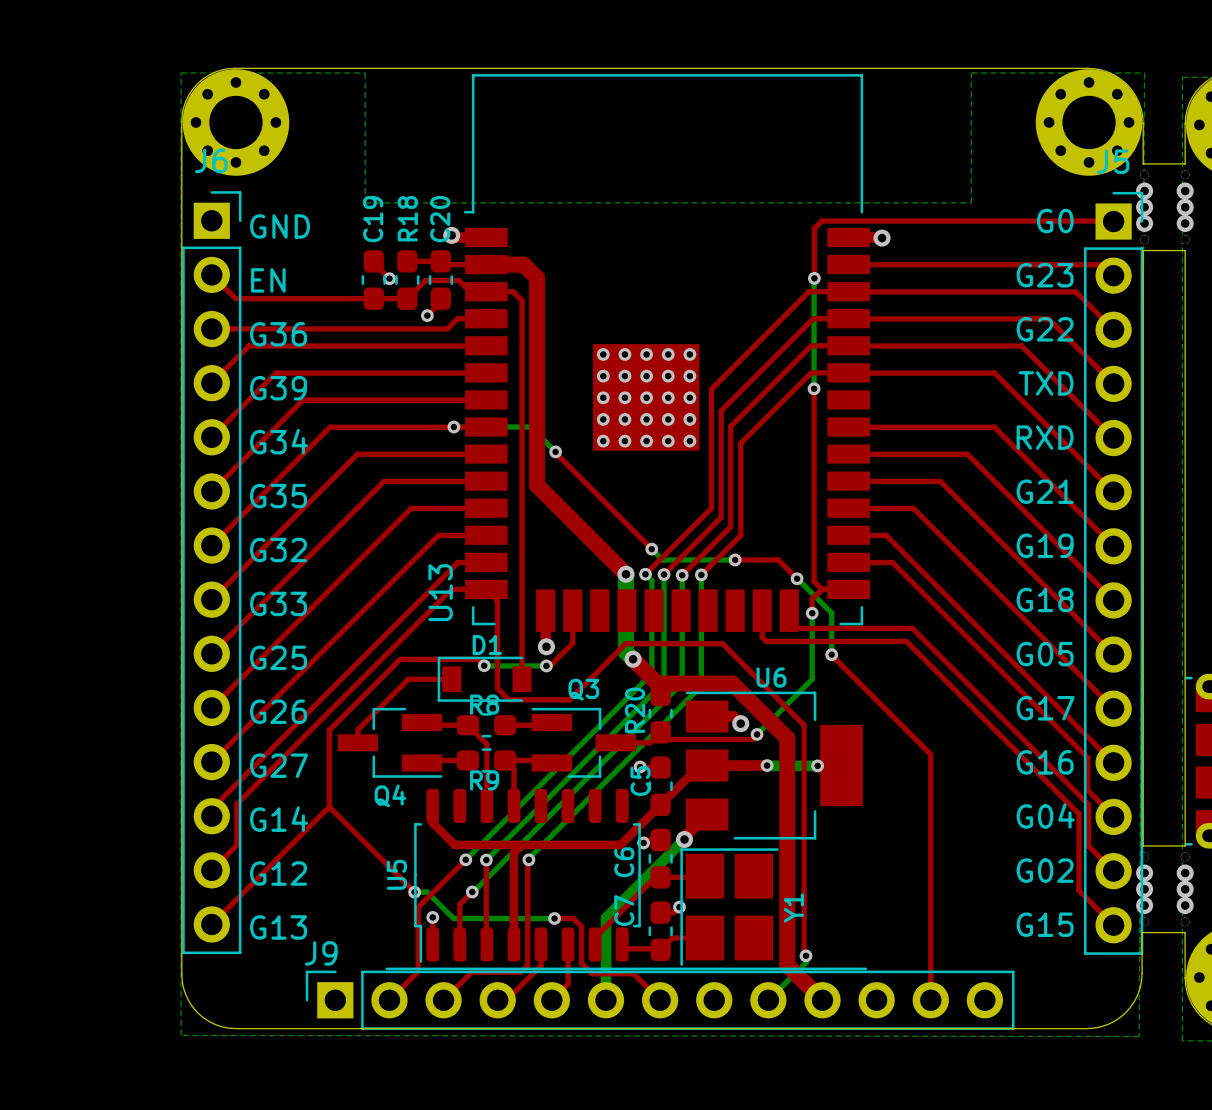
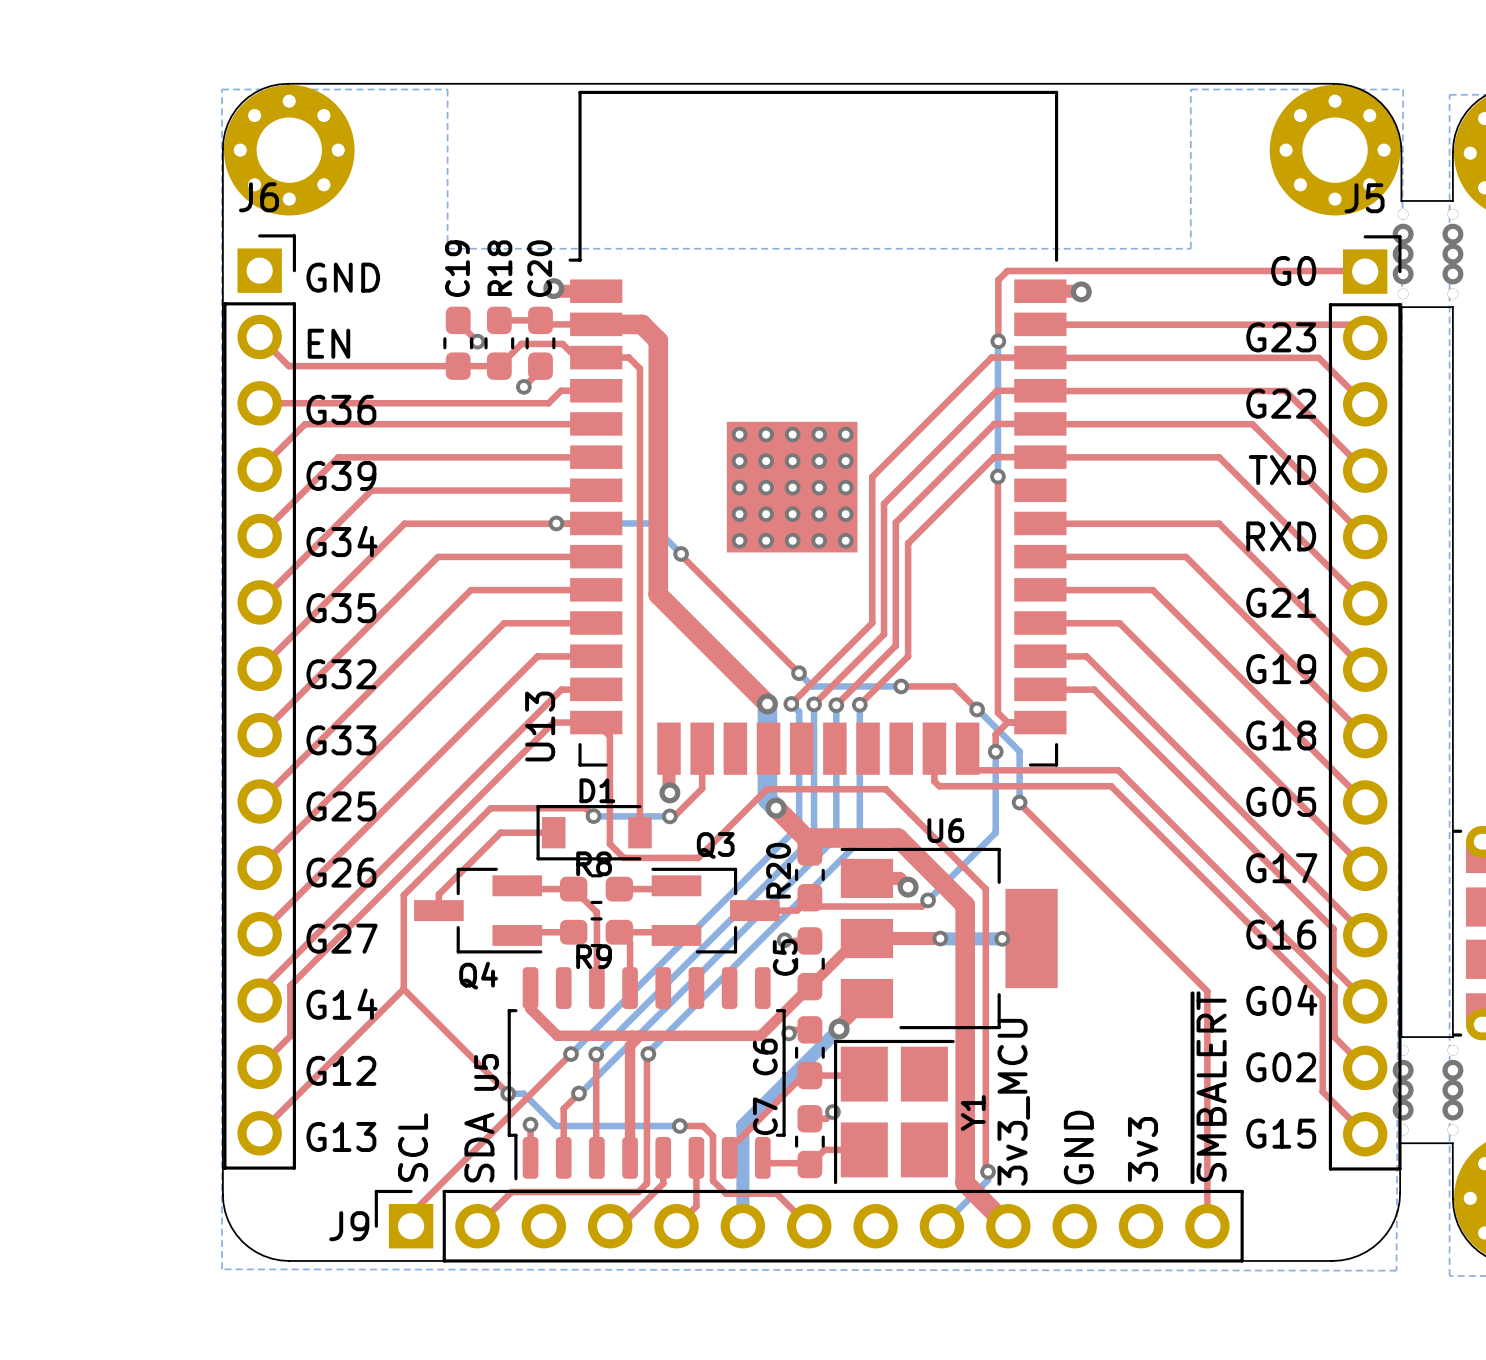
top track: (930, 754) (930, 1000) -> (1141, 924) (1207, 991) (1207, 1226)
text: none -> ~{SMBALERT} (1208, 1087)
text: none -> 3v3_MCU (1013, 1102)
top track: (418, 907) (417, 972) -> (512, 1112) (411, 1213) (411, 1226)
text: none -> SCL (413, 1147)
text: none -> SDA (479, 1147)
text: none -> GND (1078, 1147)
text: none -> 3v3 (1142, 1149)
J9 name position: J9 (321, 953) -> J9 (349, 1226)
line: (386, 968) (865, 968) -> none
top track: (471, 972) (443, 1000) -> (578, 1191) (511, 1191)

